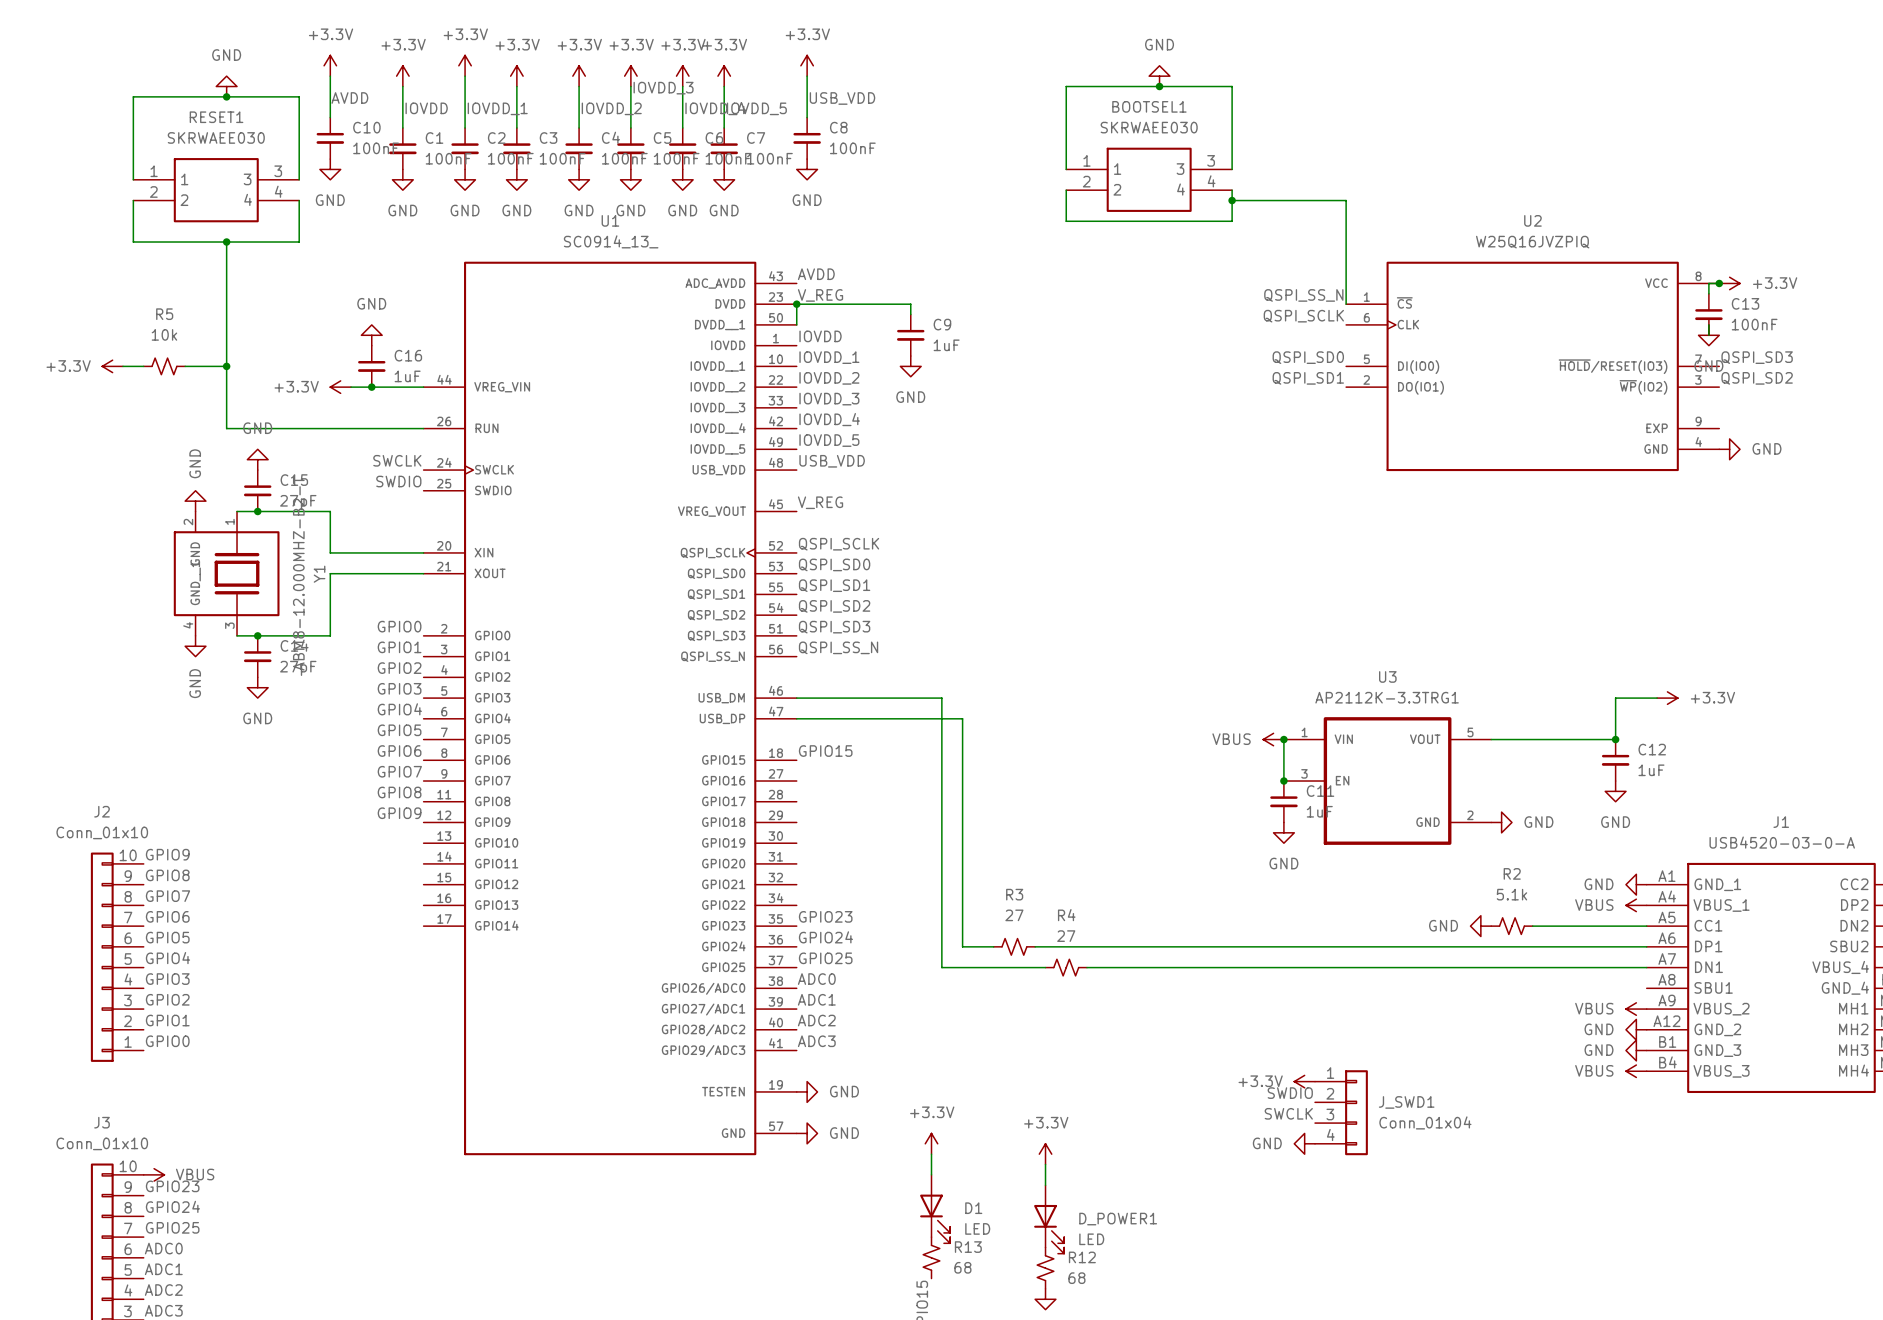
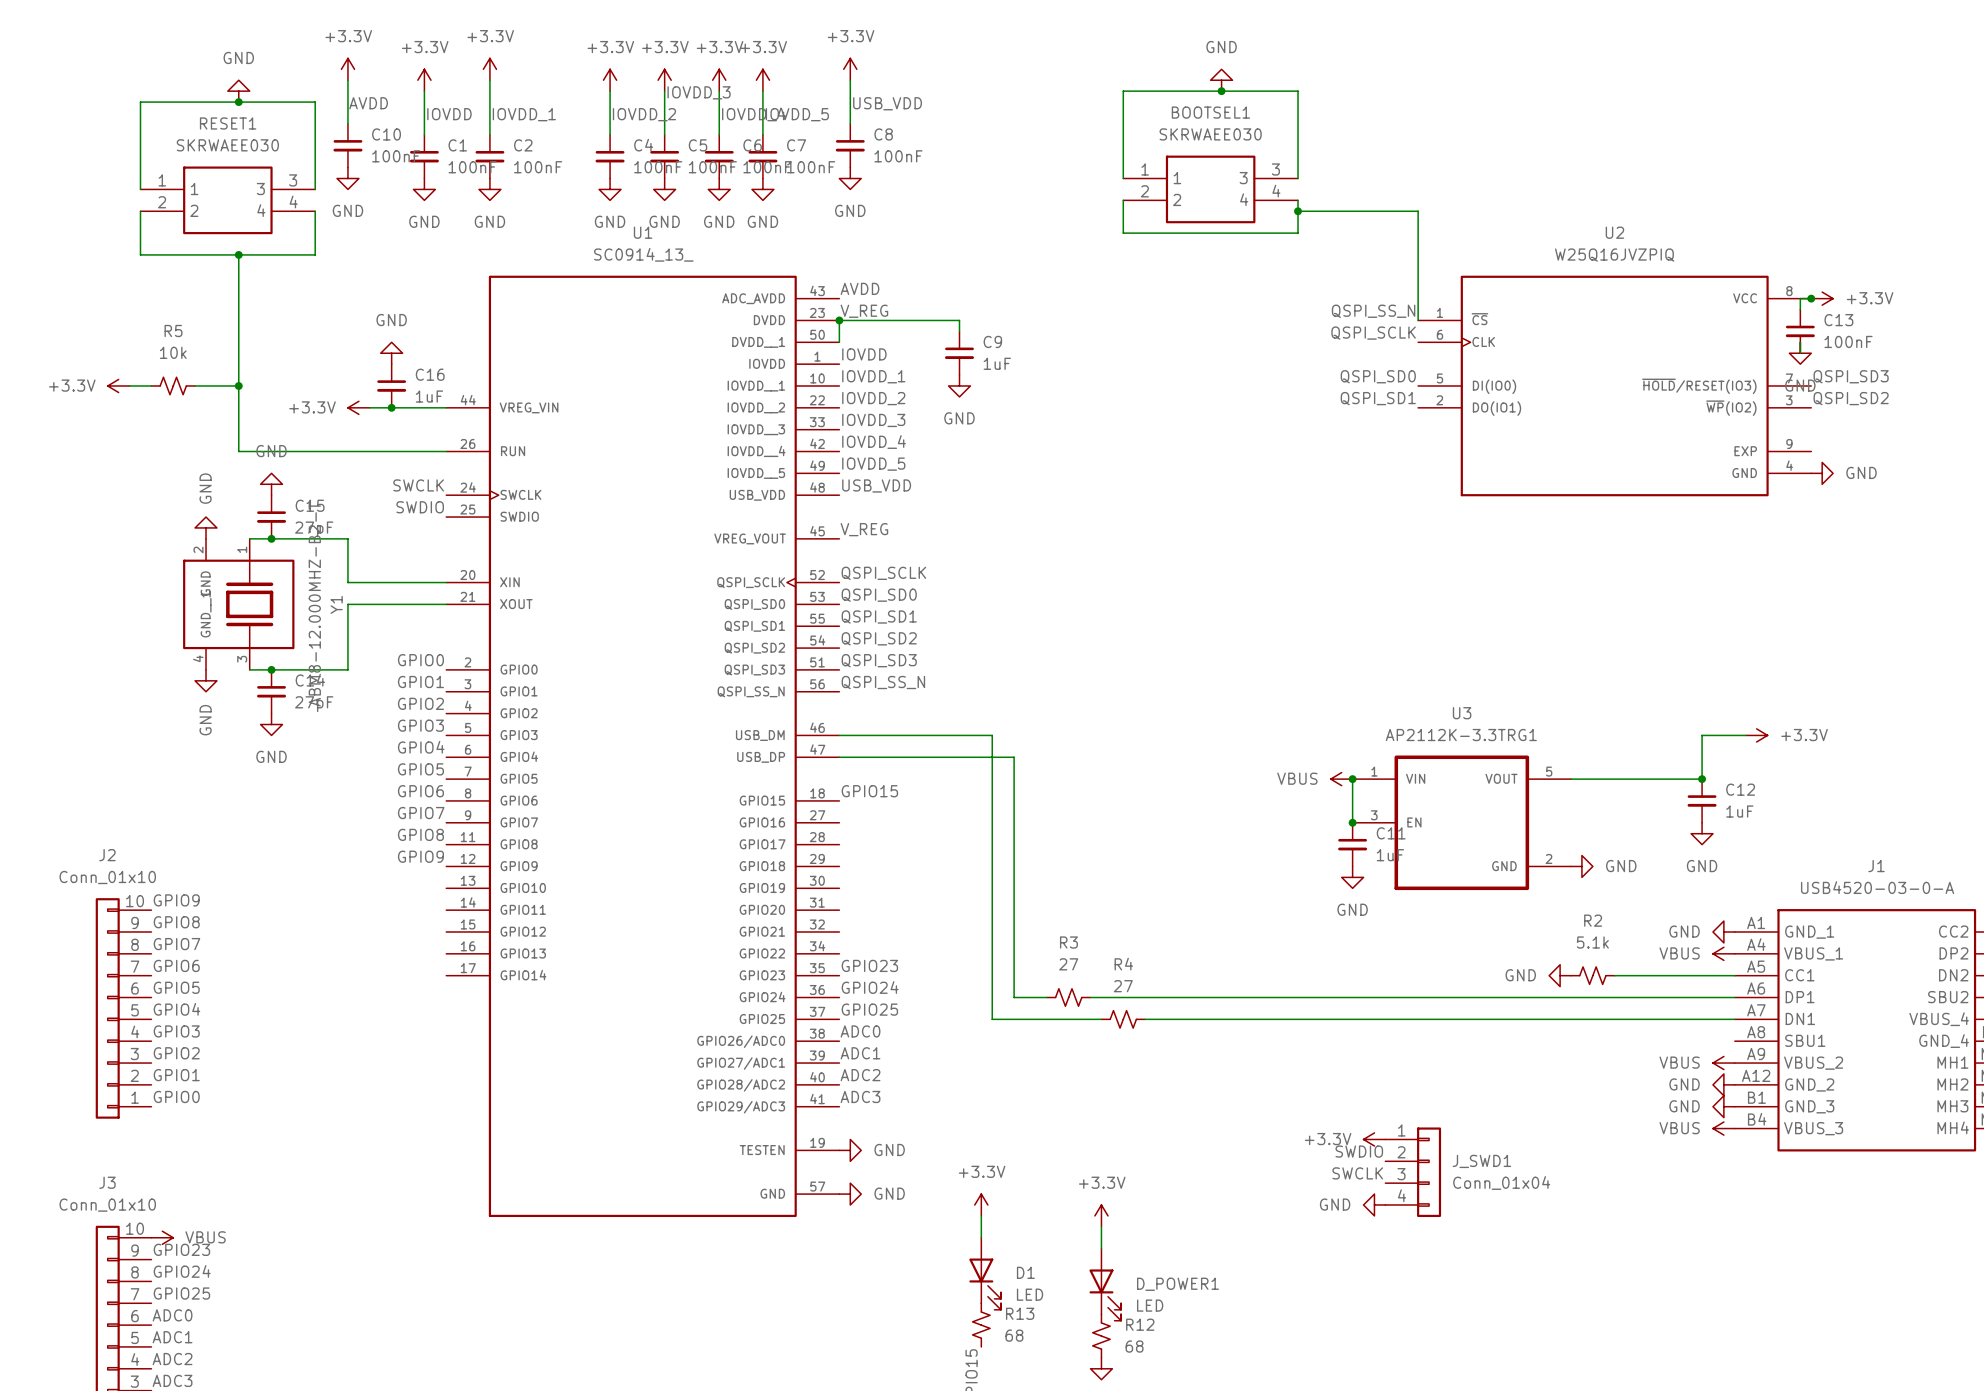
power symbol: +3.3V (516, 76) -> none
wire: (516, 86) (516, 127) -> none
C3: 100nF (516, 148) -> none
power symbol: GND (516, 179) -> none

